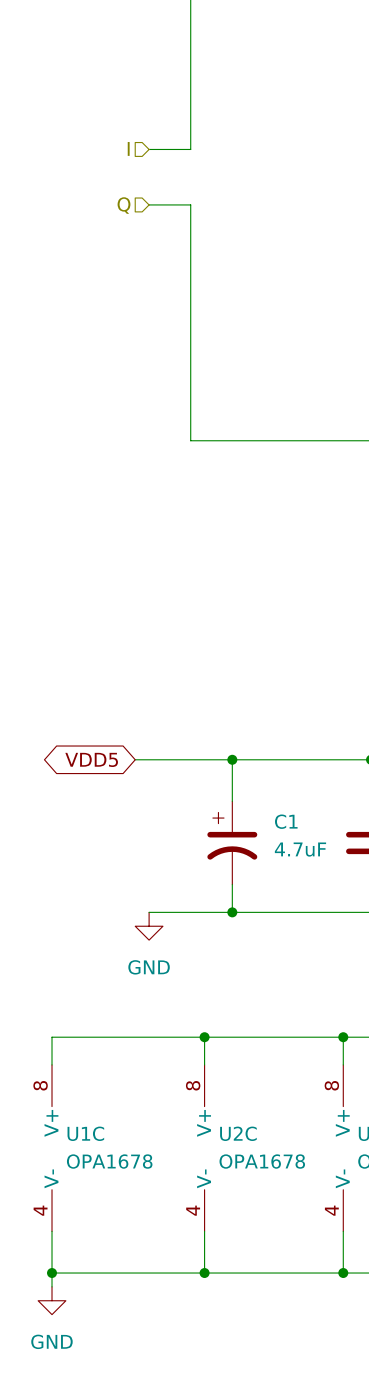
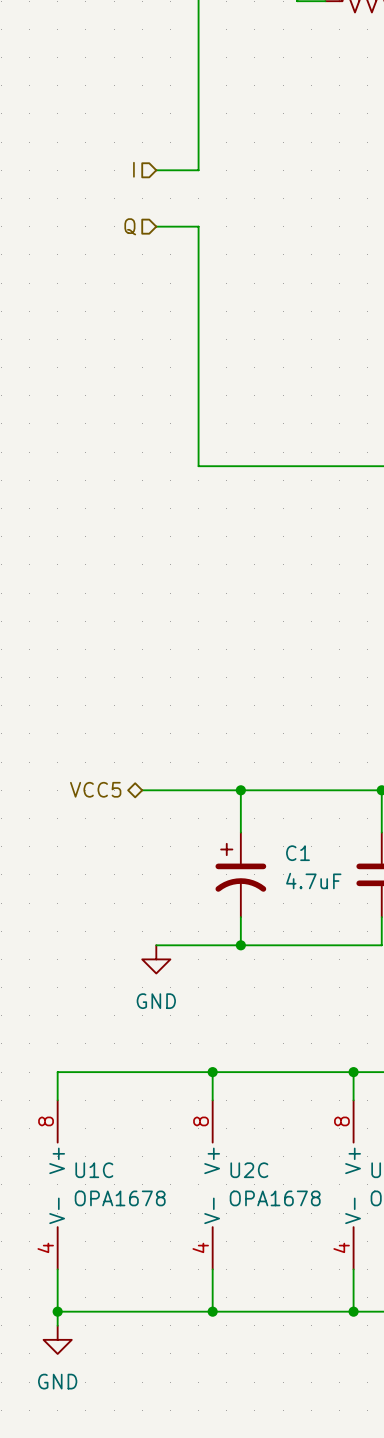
global label: VDD5 (91, 759) -> none
hierarchical label: none -> VCC5 (95, 789)

